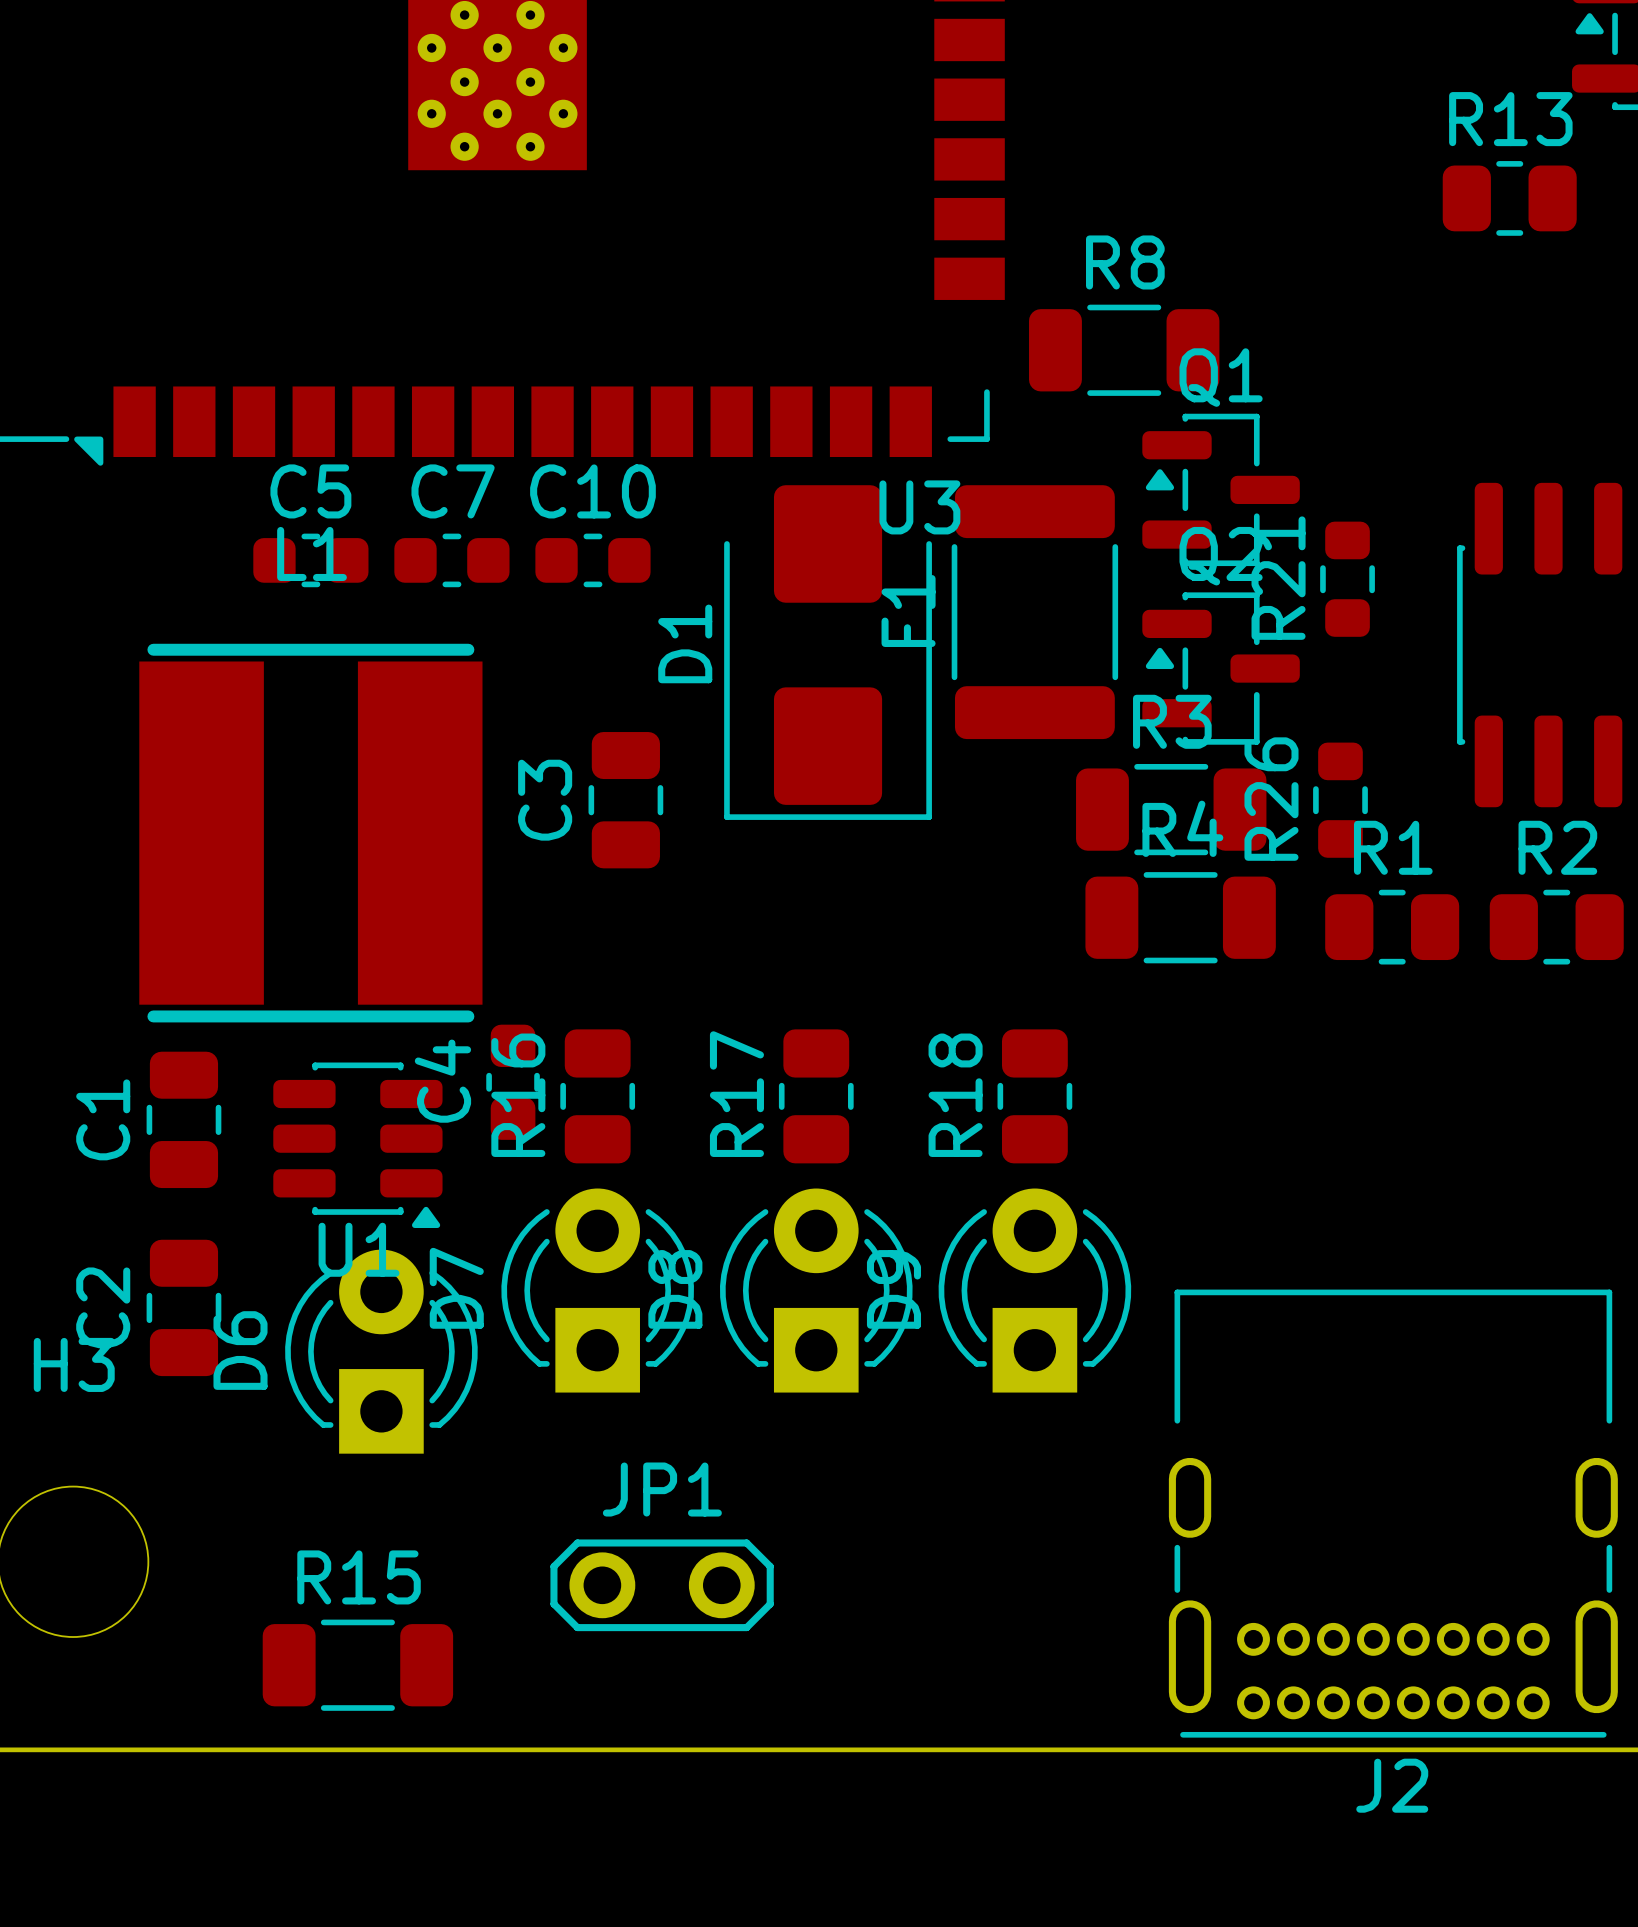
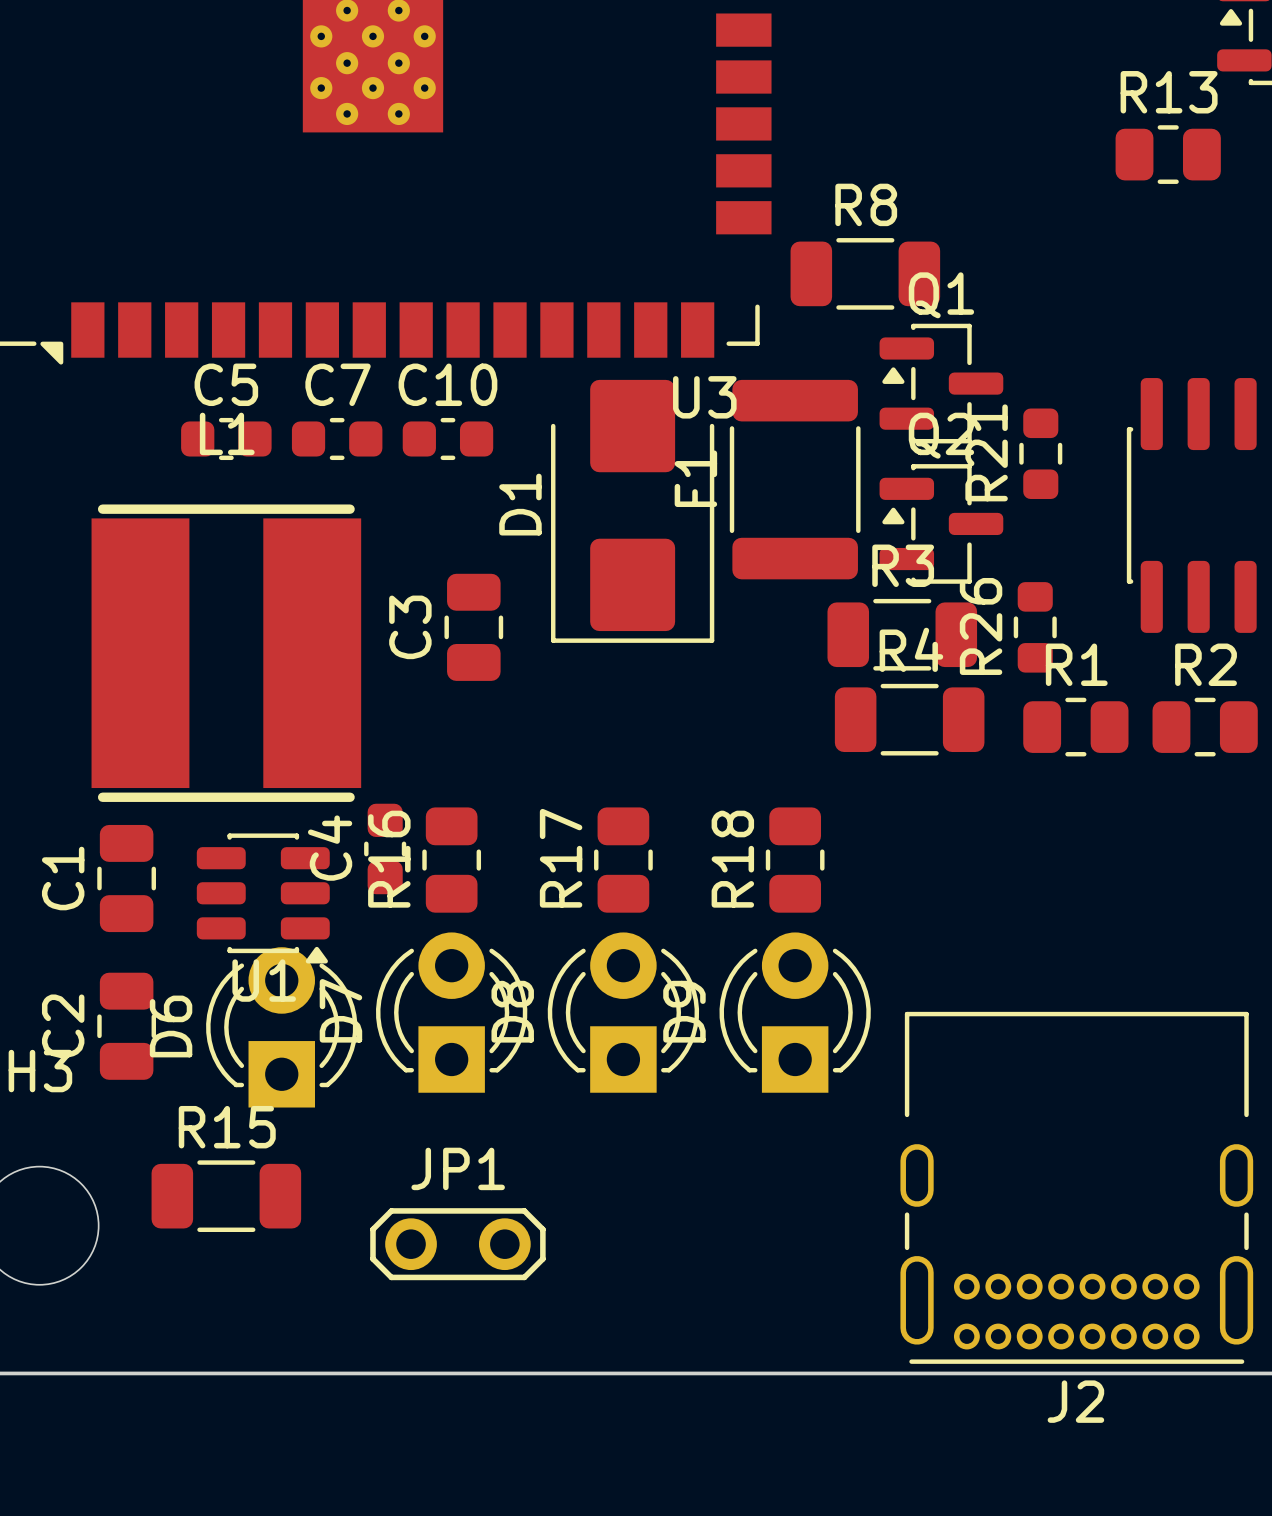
D6 position: (381, 1351) -> (281, 1027)
JP1 position: (662, 1585) -> (457, 1244)
R15 position: (357, 1665) -> (226, 1196)

